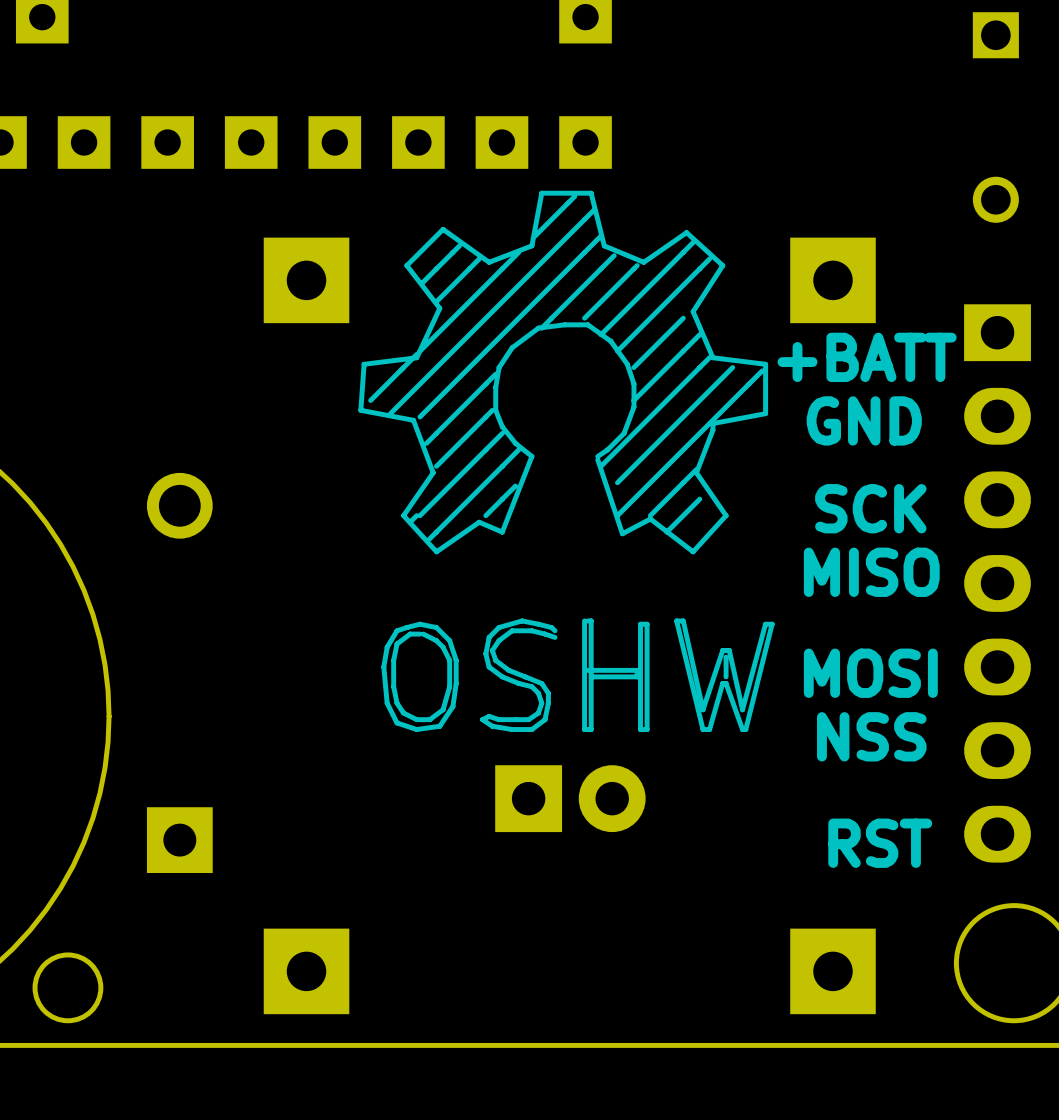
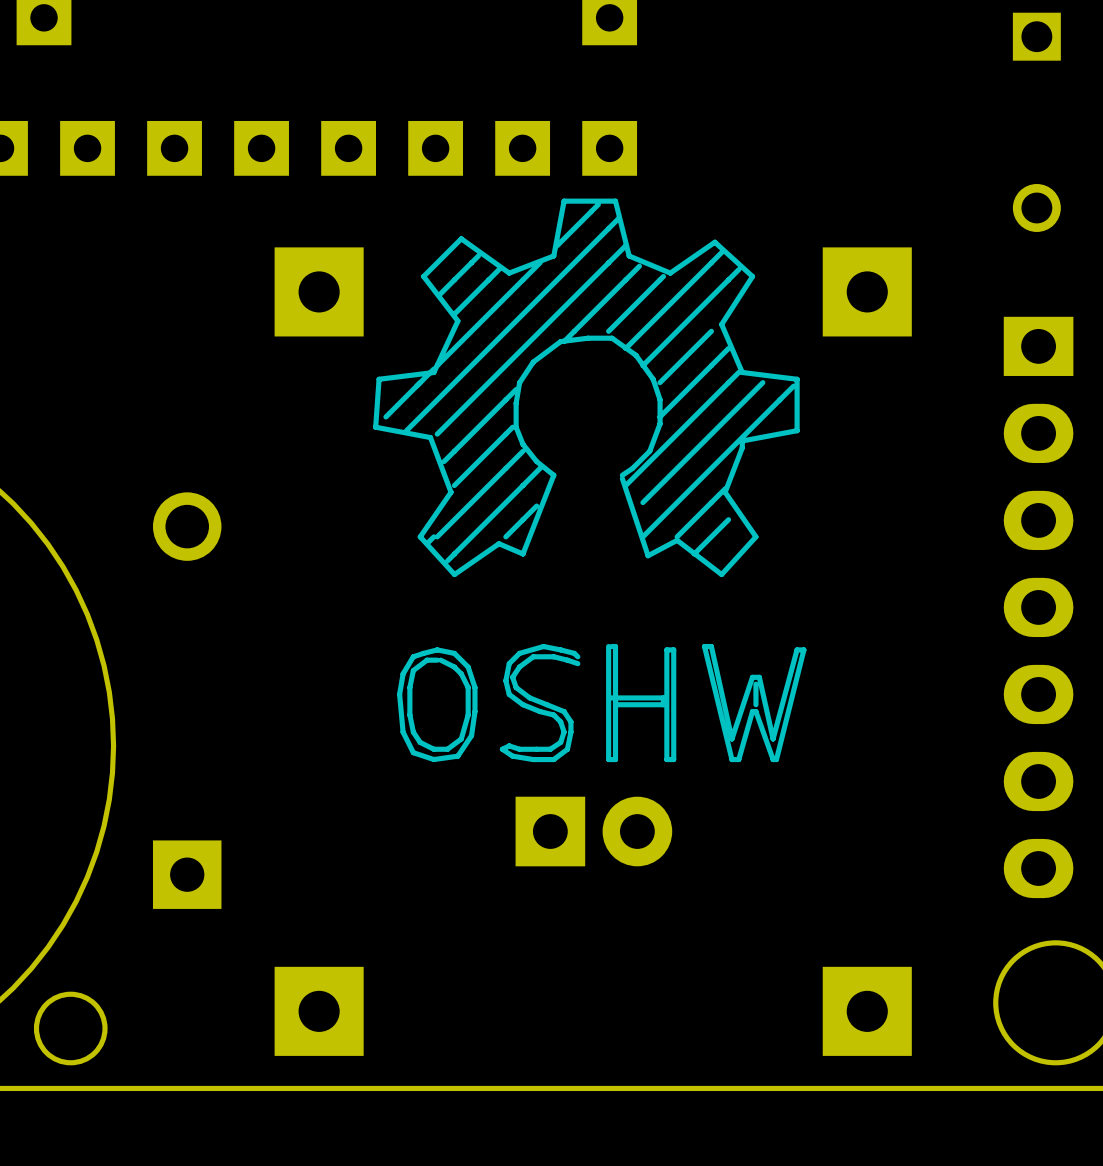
text: +BATT (867, 357) -> none
text: GND (864, 420) -> none
text: SCK (870, 508) -> none
text: MISO (871, 572) -> none
text: MOSI (870, 673) -> none
text: NSS (871, 736) -> none
text: RST (880, 843) -> none

